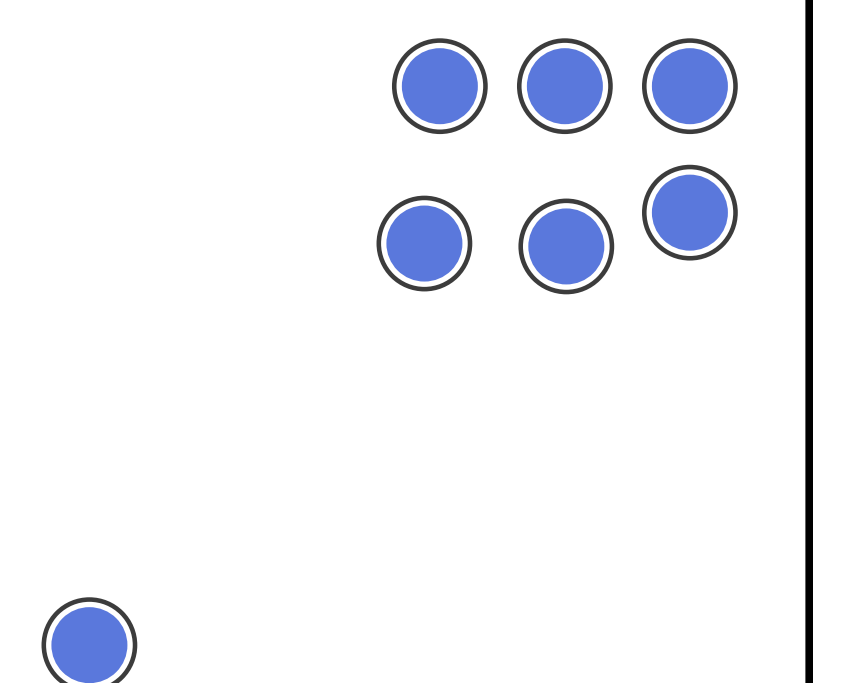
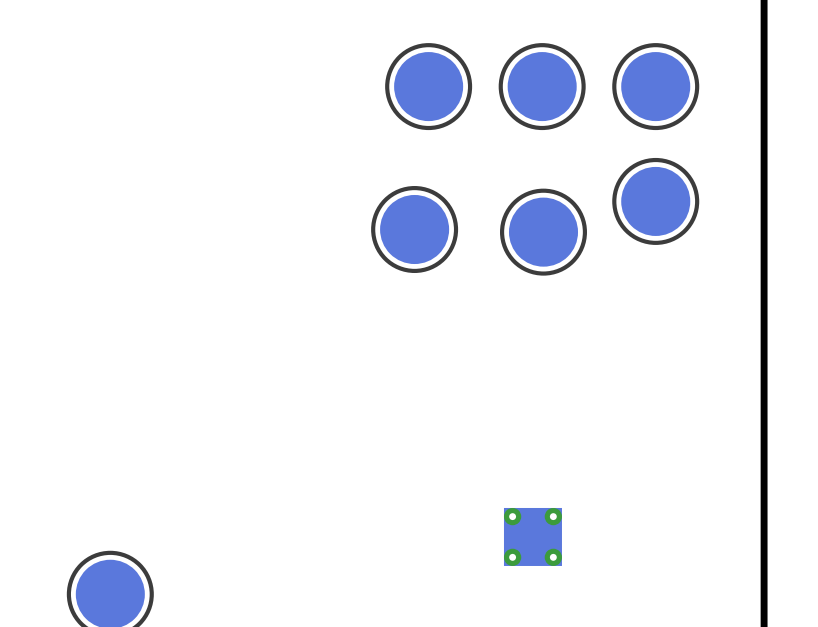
part: none -> (532, 536)

